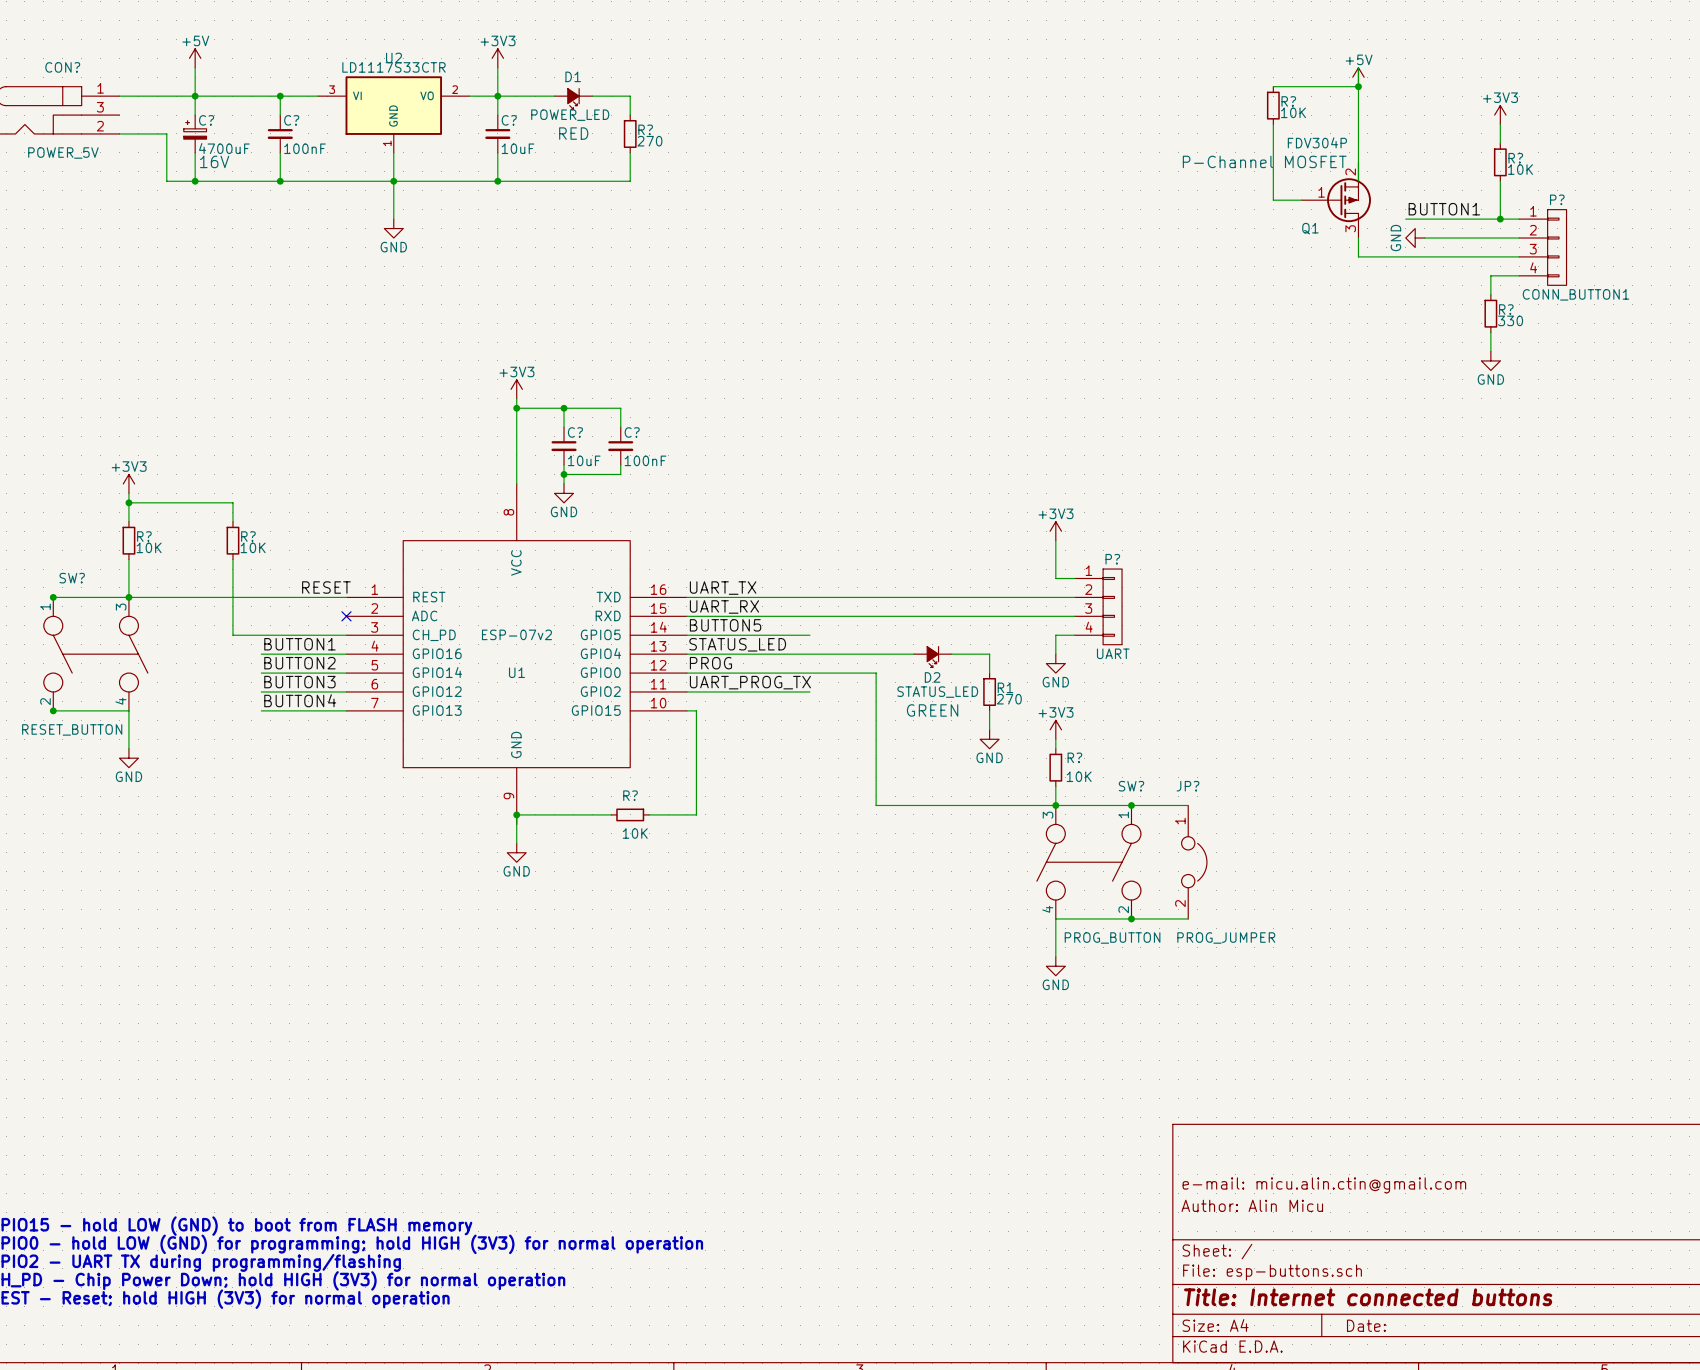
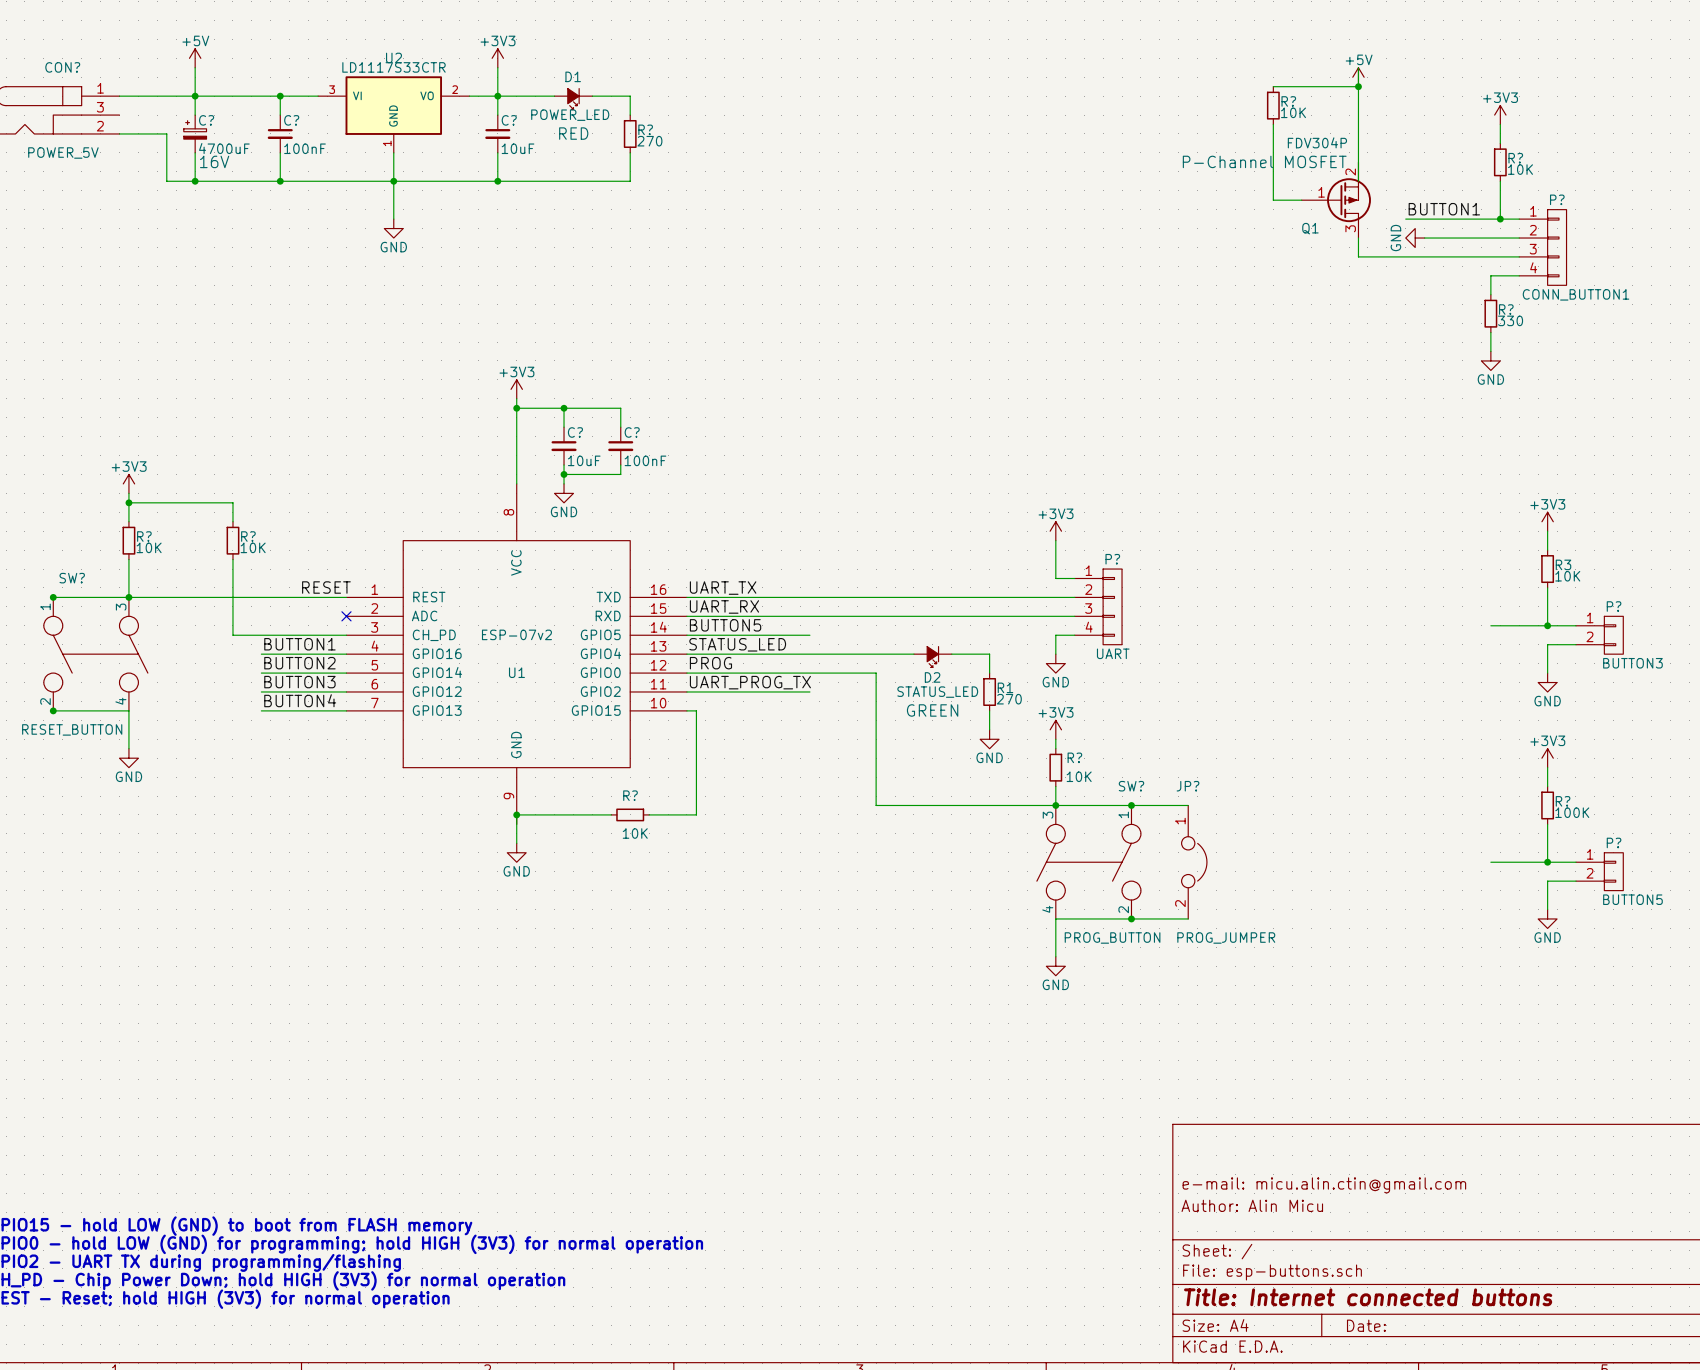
power symbol: none -> +3V3 (1547, 521)
wire: none -> (1547, 531) (1547, 550)
R3: none -> 10K (1547, 569)
wire: none -> (1547, 587) (1547, 625)
wire: none -> (1490, 625) (1575, 625)
junction: none -> (1547, 625)
P?: none -> BUTTON3 (1599, 635)
wire: none -> (1575, 644) (1547, 644) (1547, 673)
power symbol: none -> GND (1547, 682)
power symbol: none -> +3V3 (1547, 758)
wire: none -> (1547, 767) (1547, 786)
R?: none -> 100K (1547, 805)
wire: none -> (1547, 824) (1547, 862)
wire: none -> (1490, 862) (1575, 862)
junction: none -> (1547, 862)
P?: none -> BUTTON5 (1599, 871)
wire: none -> (1575, 881) (1547, 881) (1547, 909)
power symbol: none -> GND (1547, 918)

